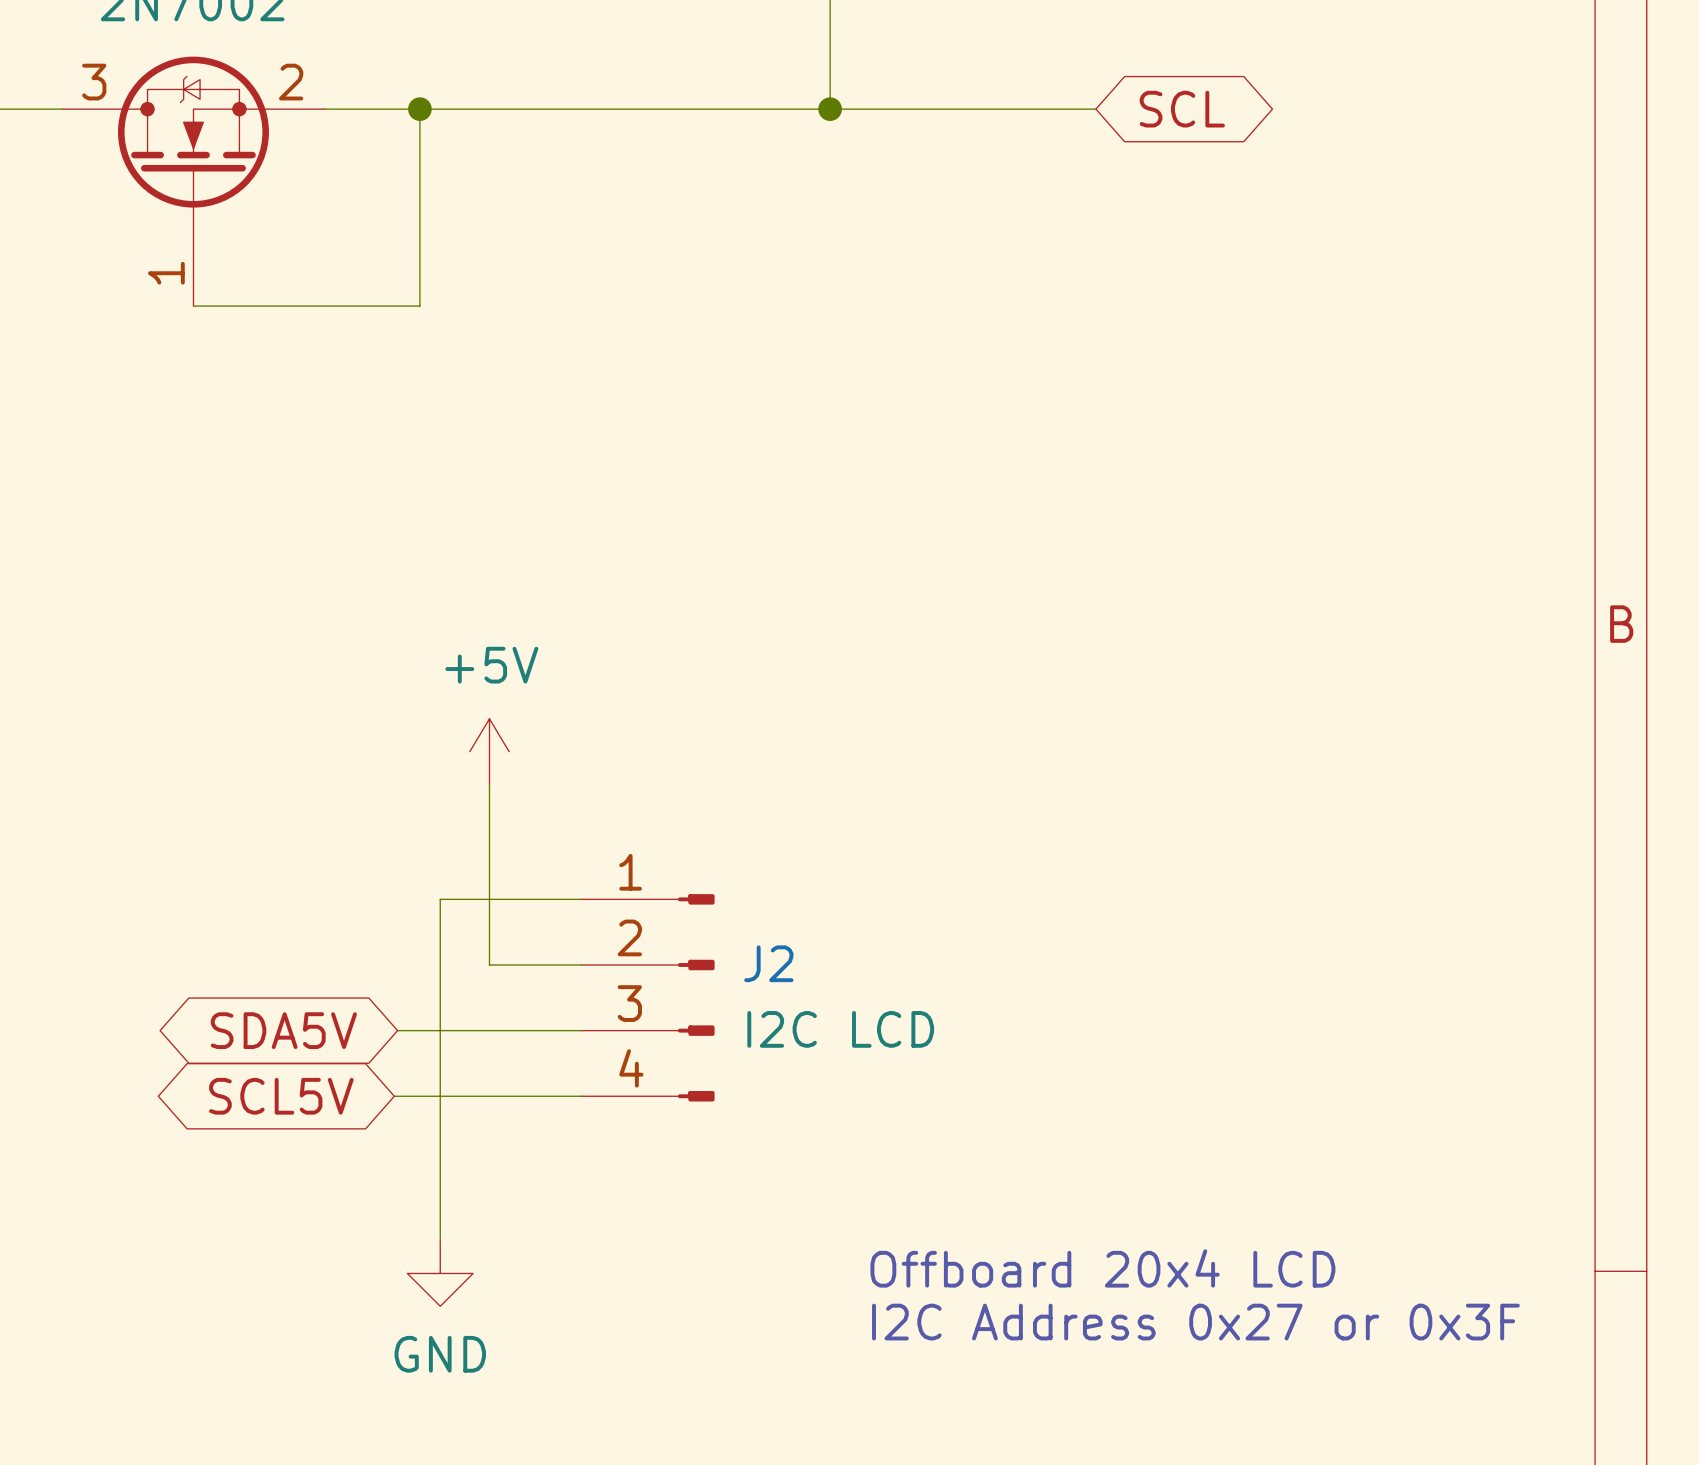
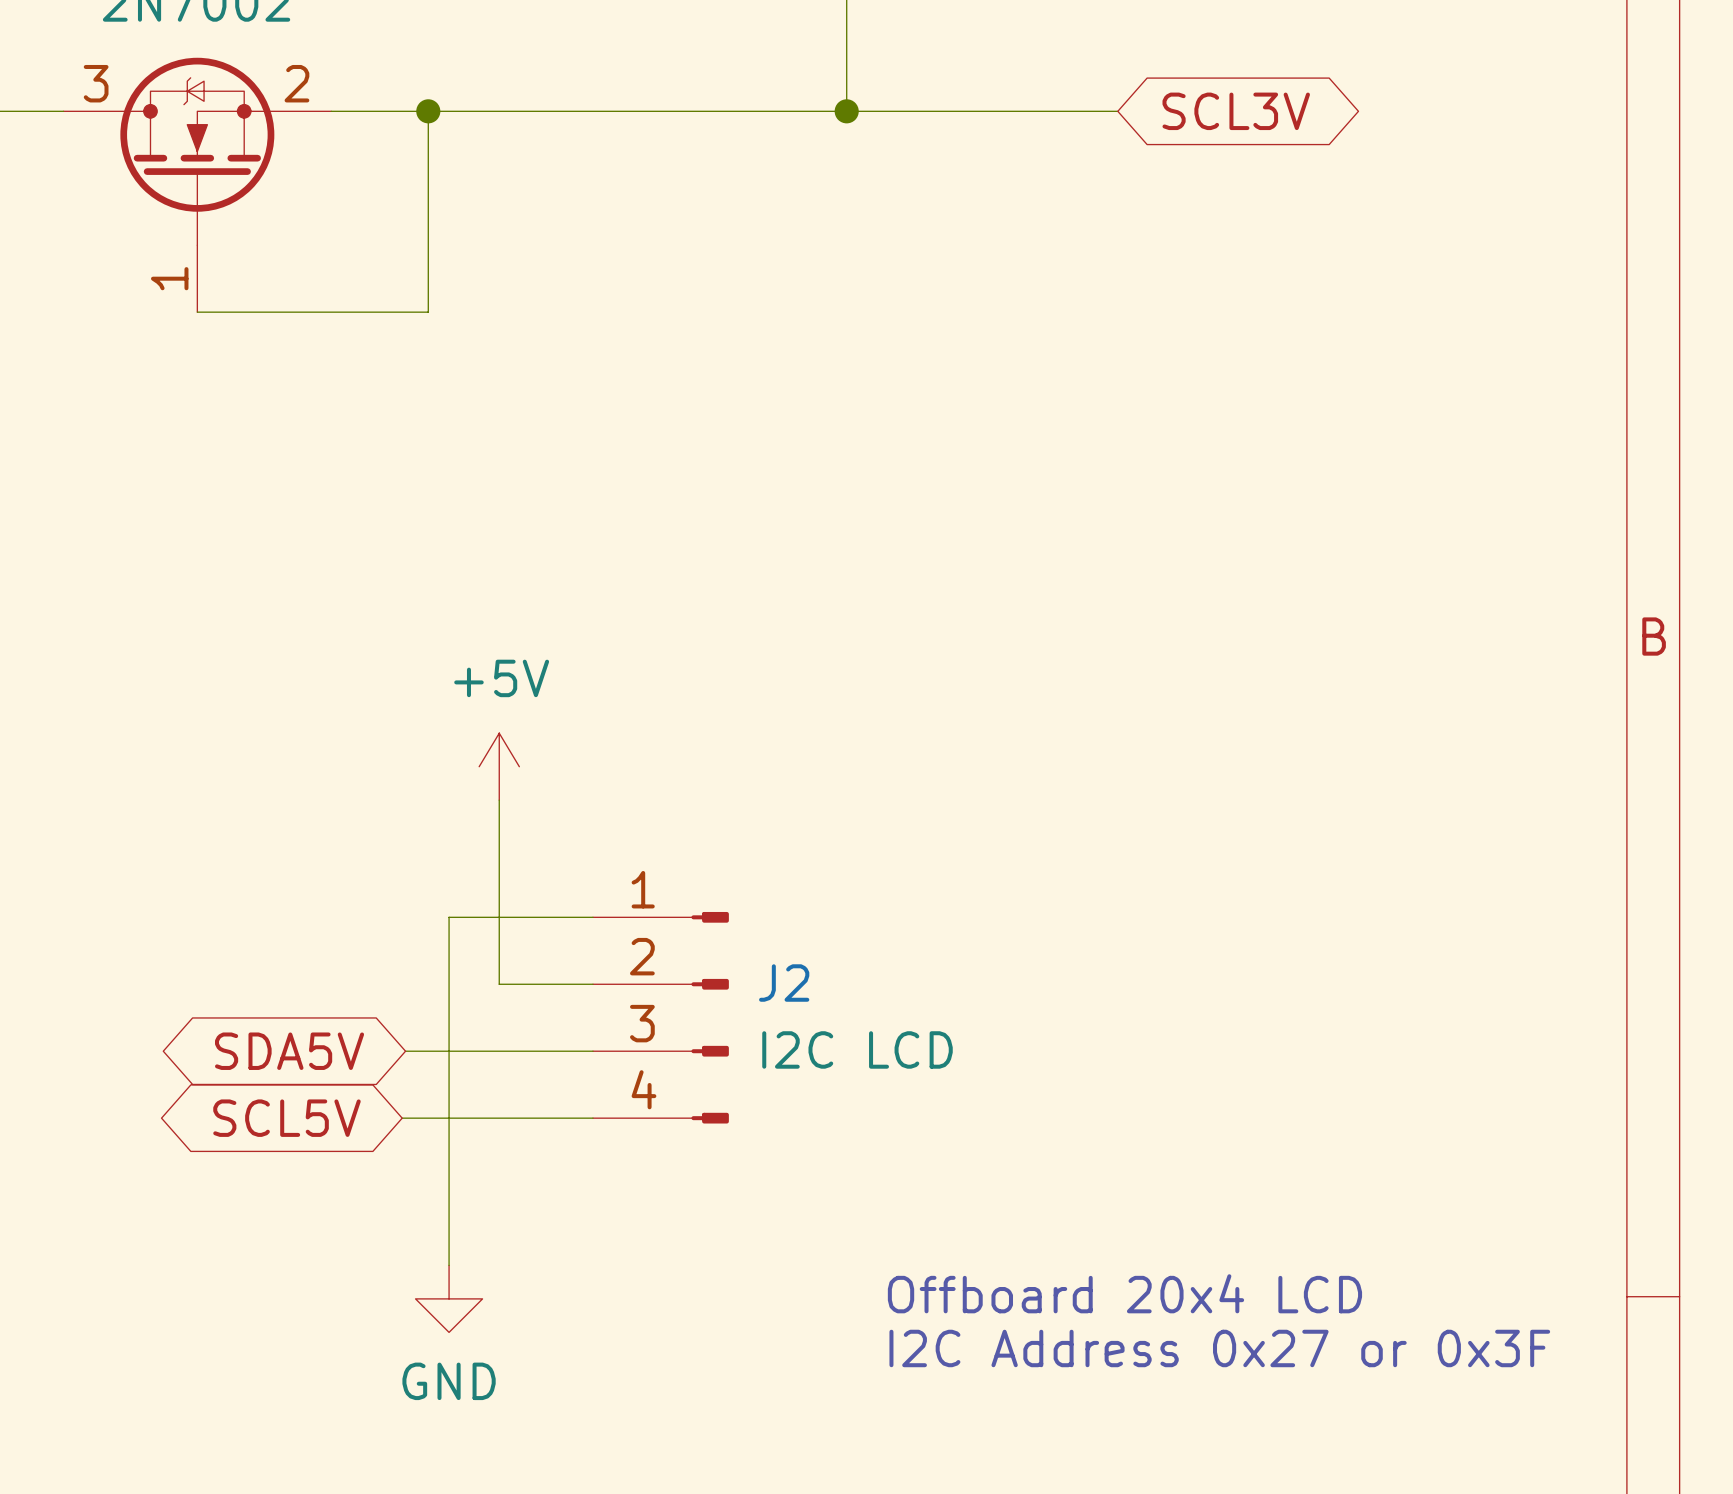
global label: SCL (1182, 109) -> SCL3V (1236, 111)

